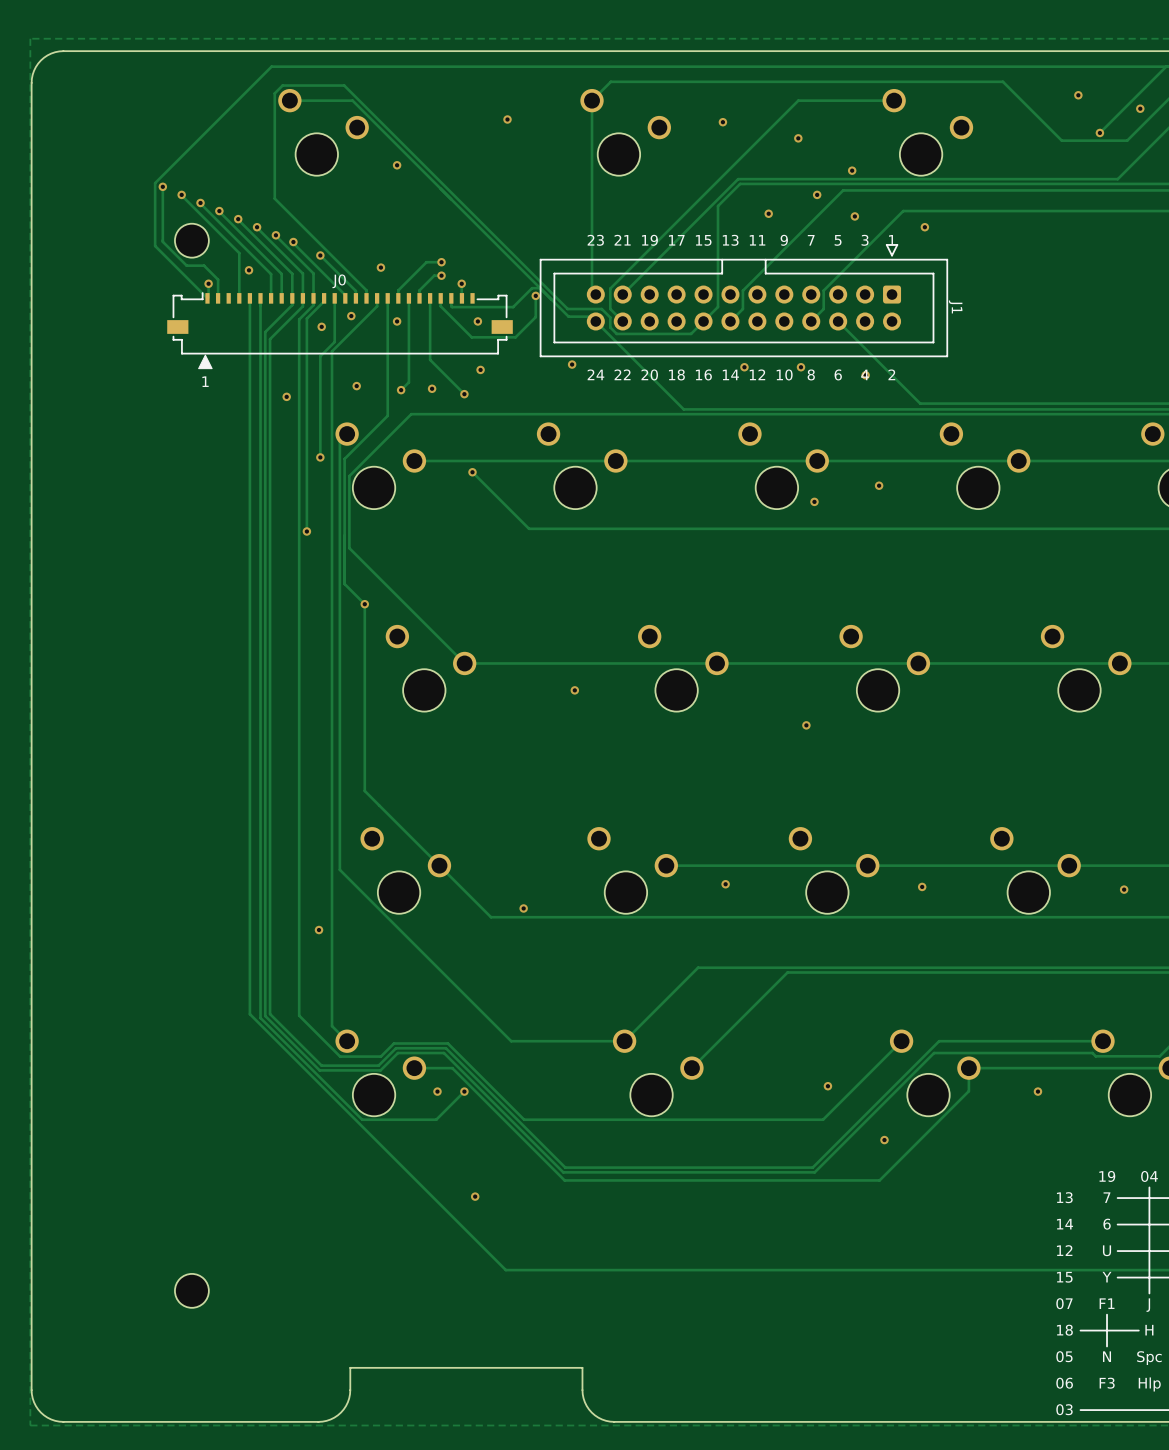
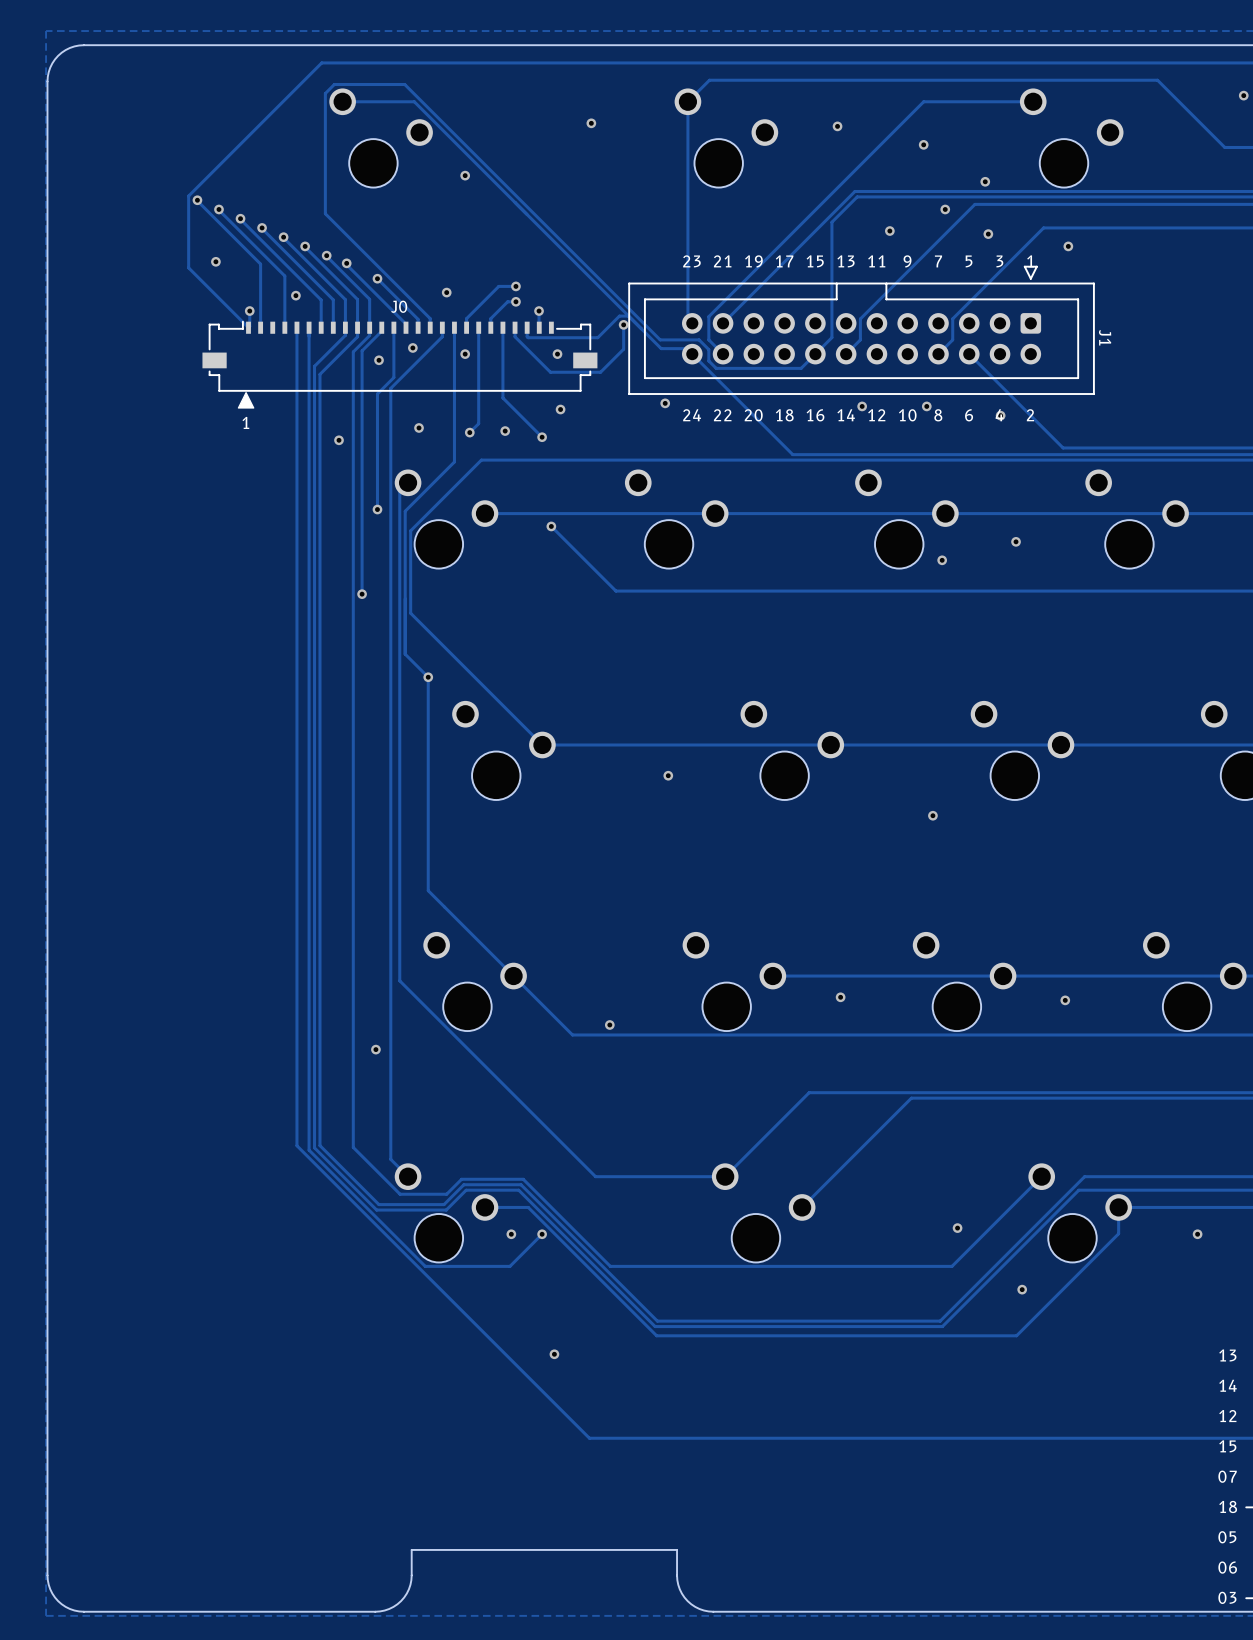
track: (162, 187) (162, 241) (186, 265) (204, 265) (218, 279) -> (197, 200) (260, 264) (260, 306)
via: none -> (215, 261)
part: (191, 240) -> none
part: (191, 1290) -> none

